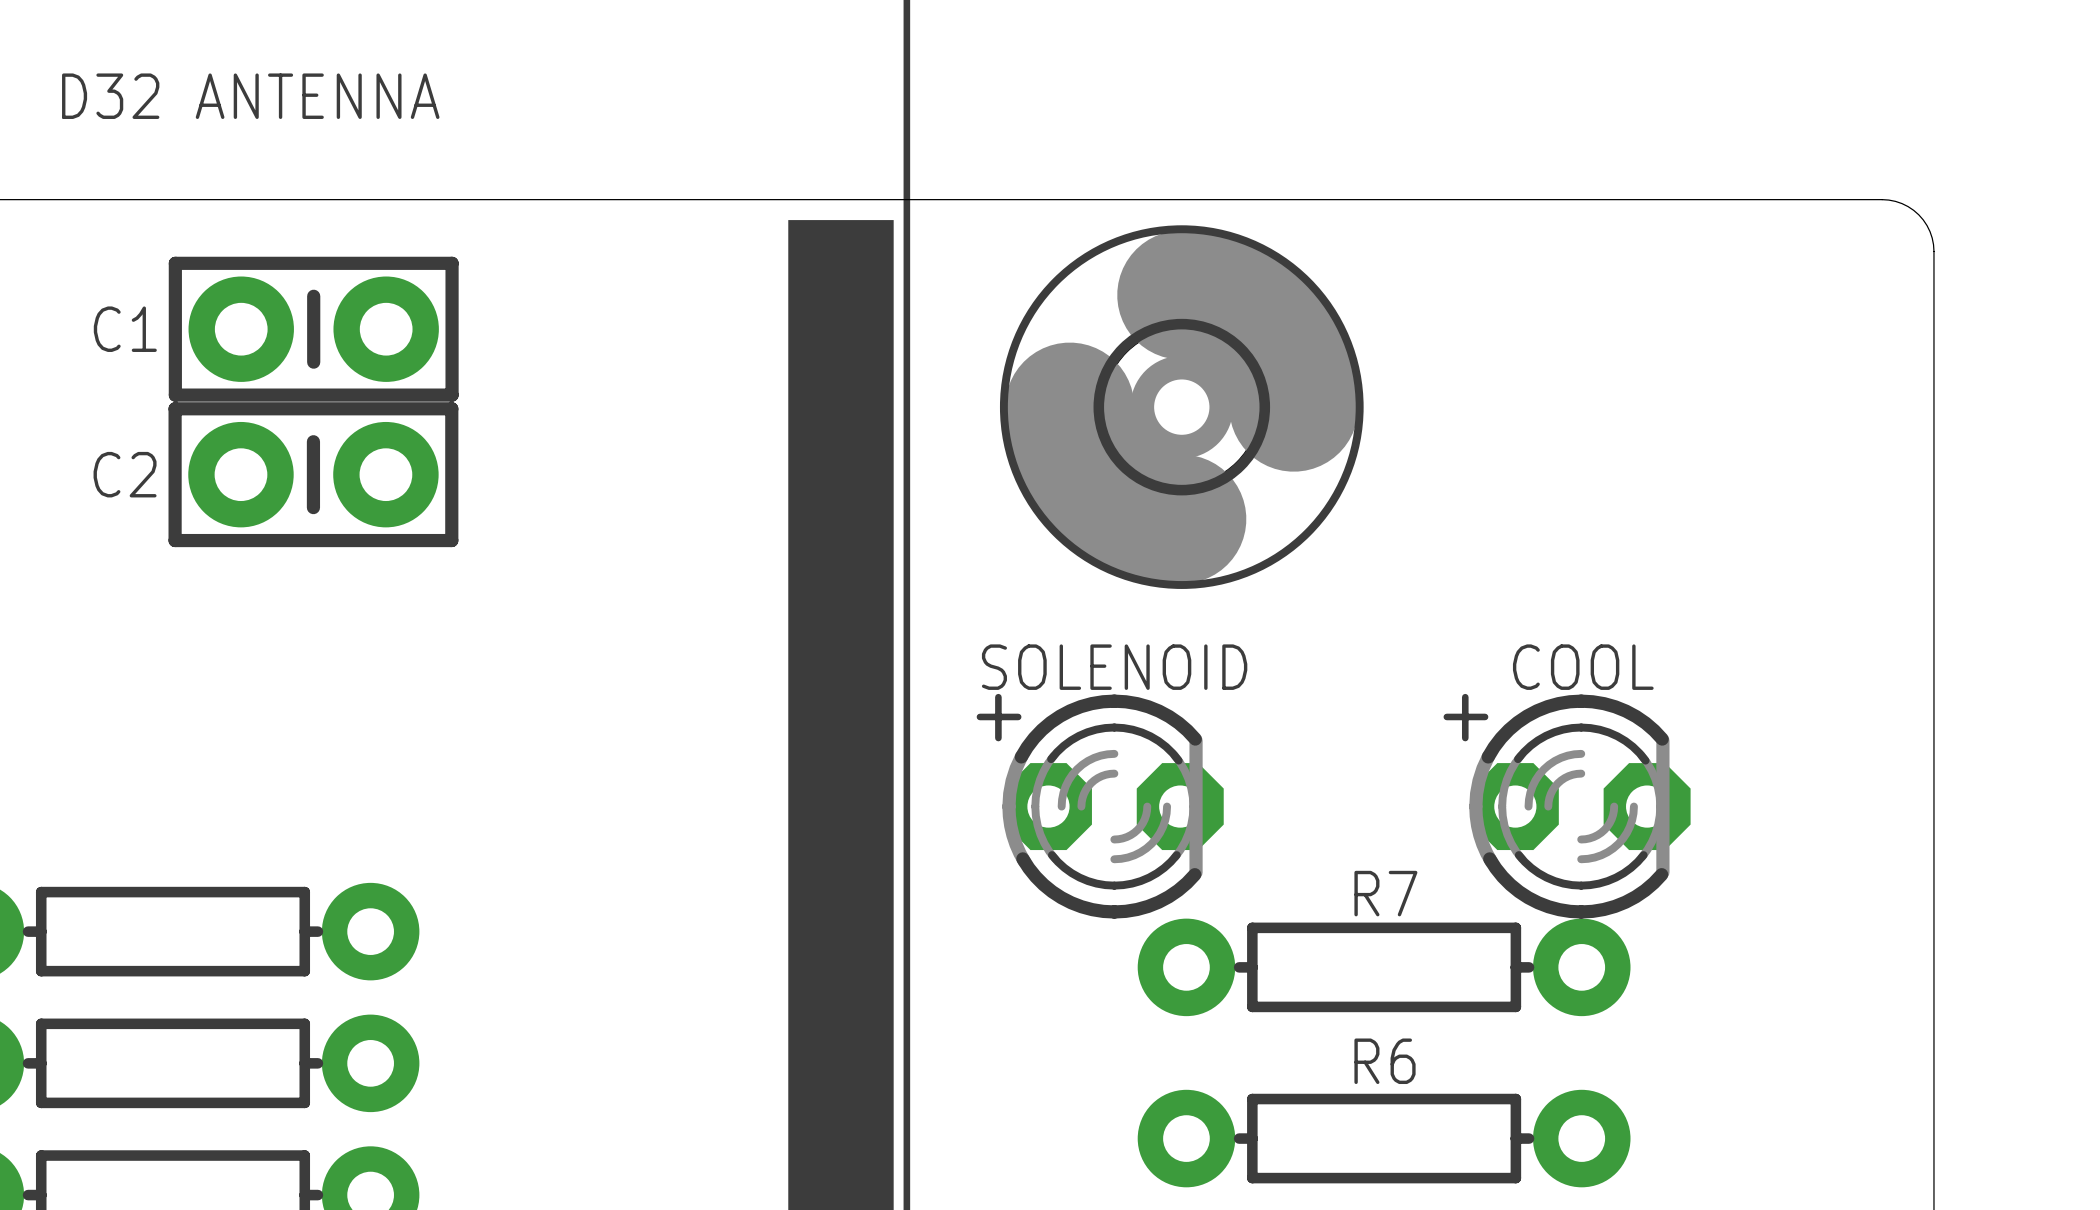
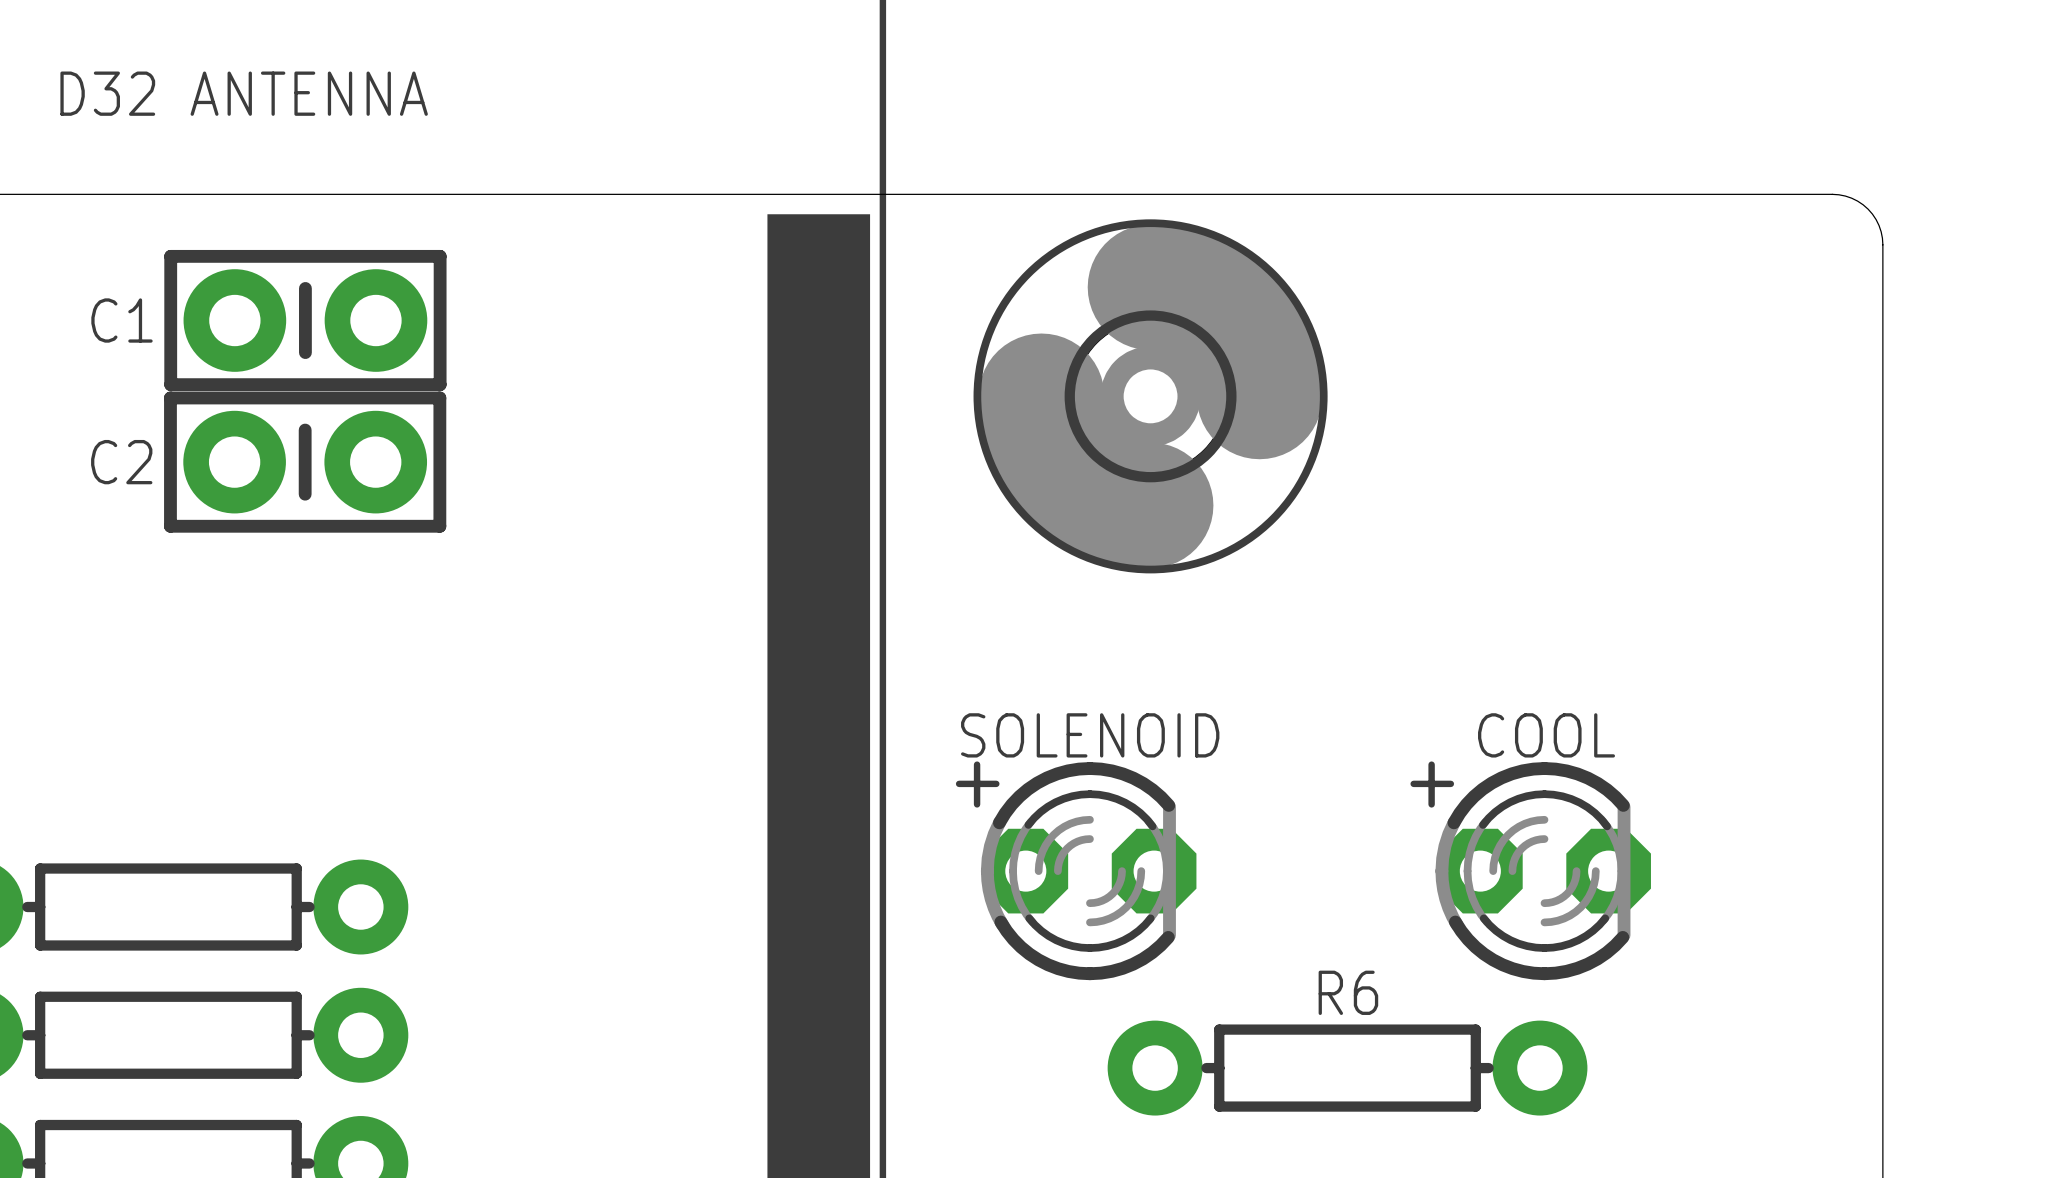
SOLENOID position: (1100, 806) -> (1076, 870)
COOL position: (1567, 806) -> (1530, 870)
R7: (1384, 967) -> none
R6 position: (1384, 1138) -> (1347, 1068)

